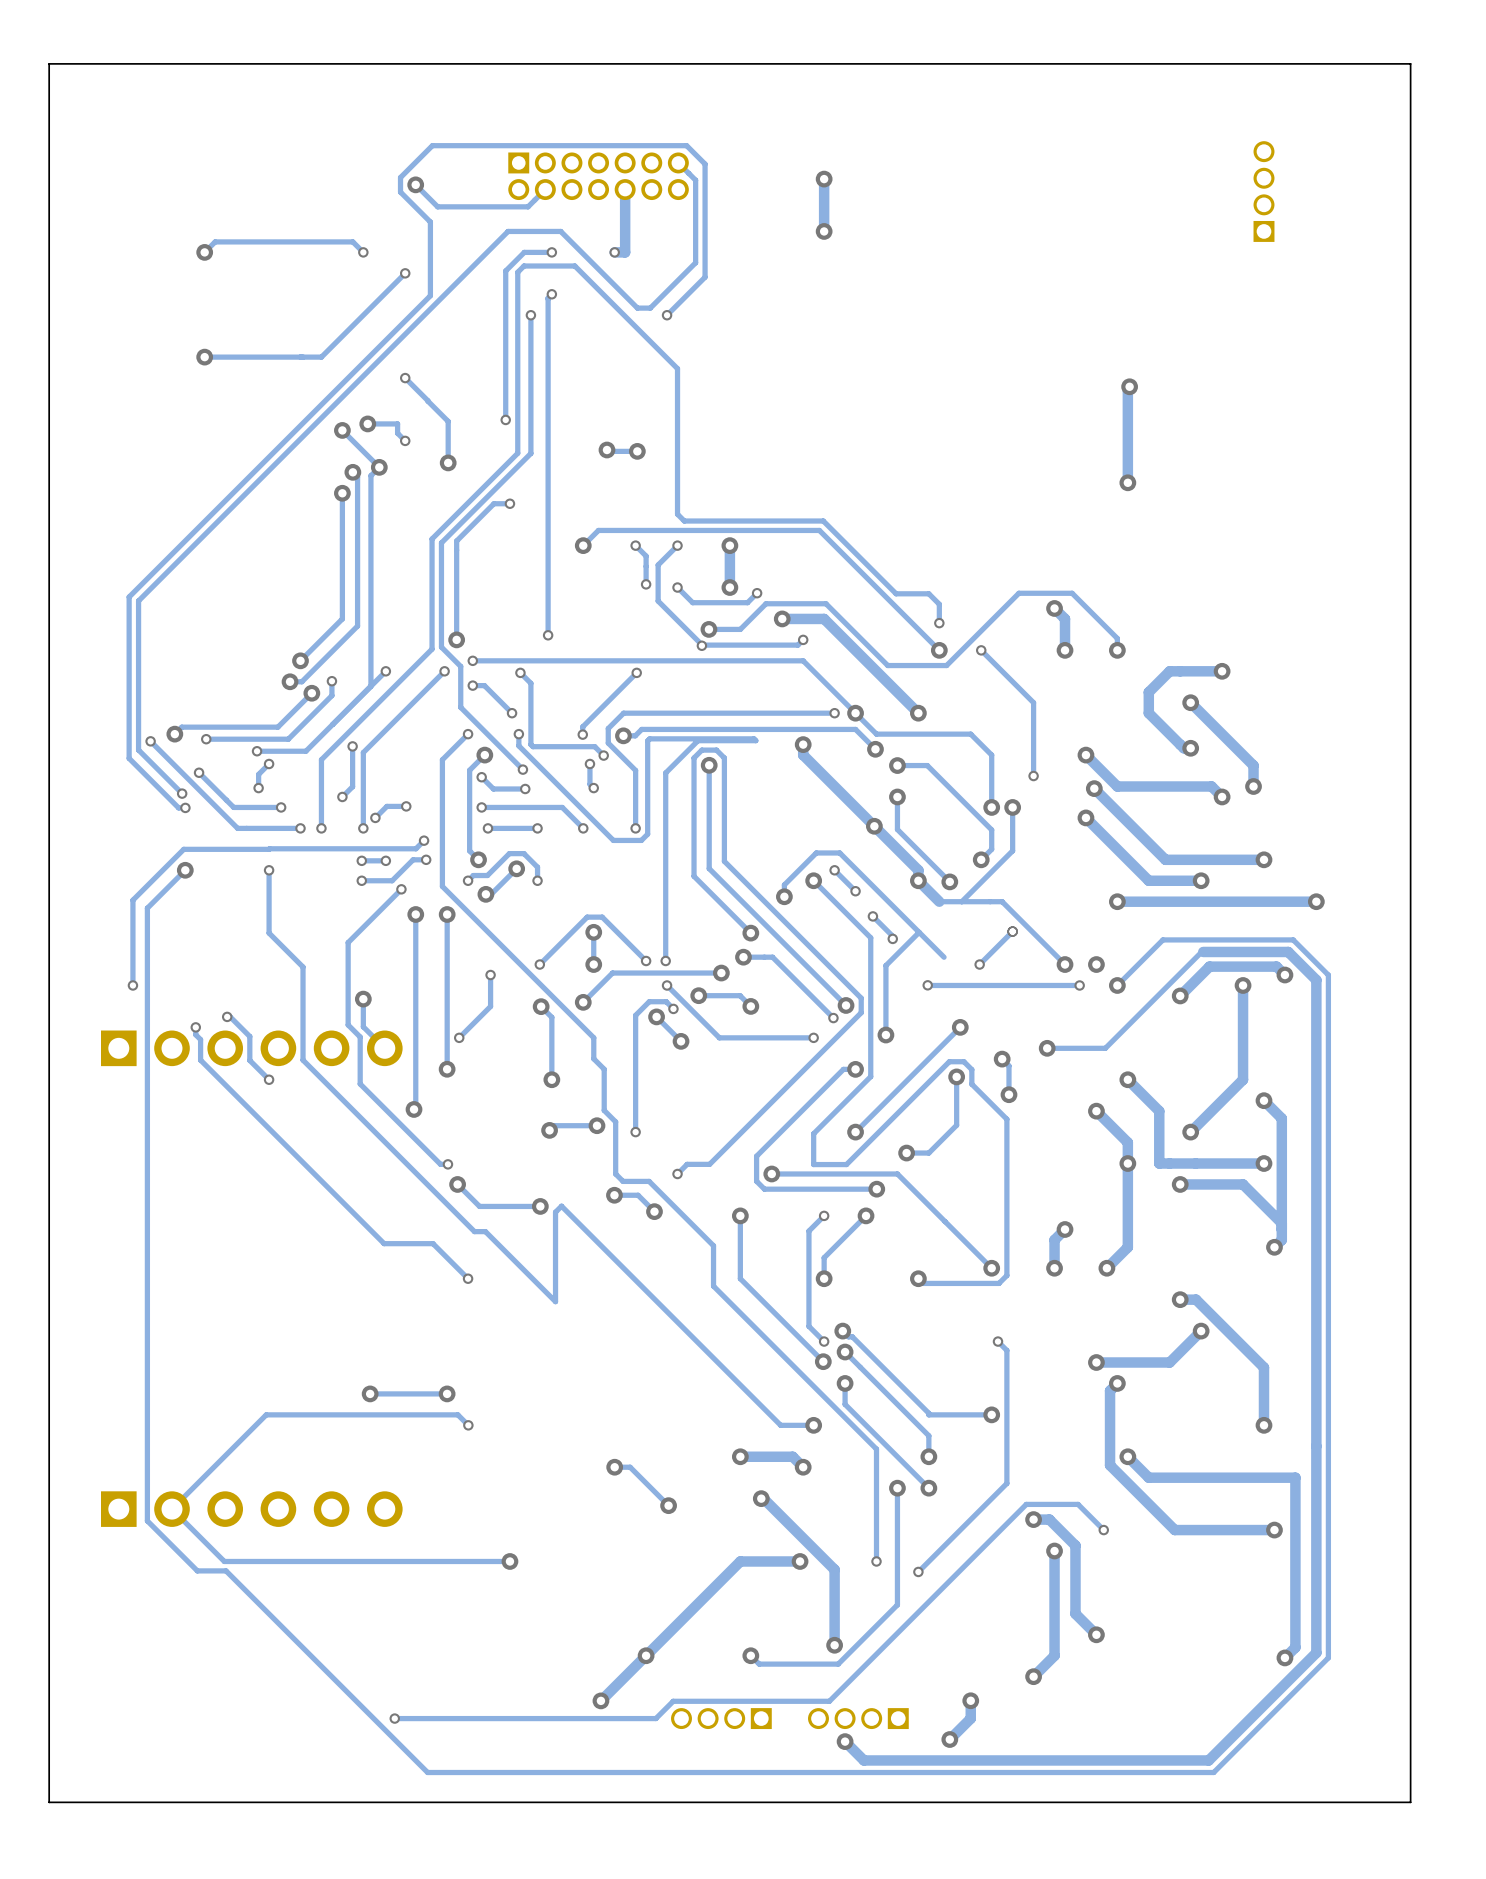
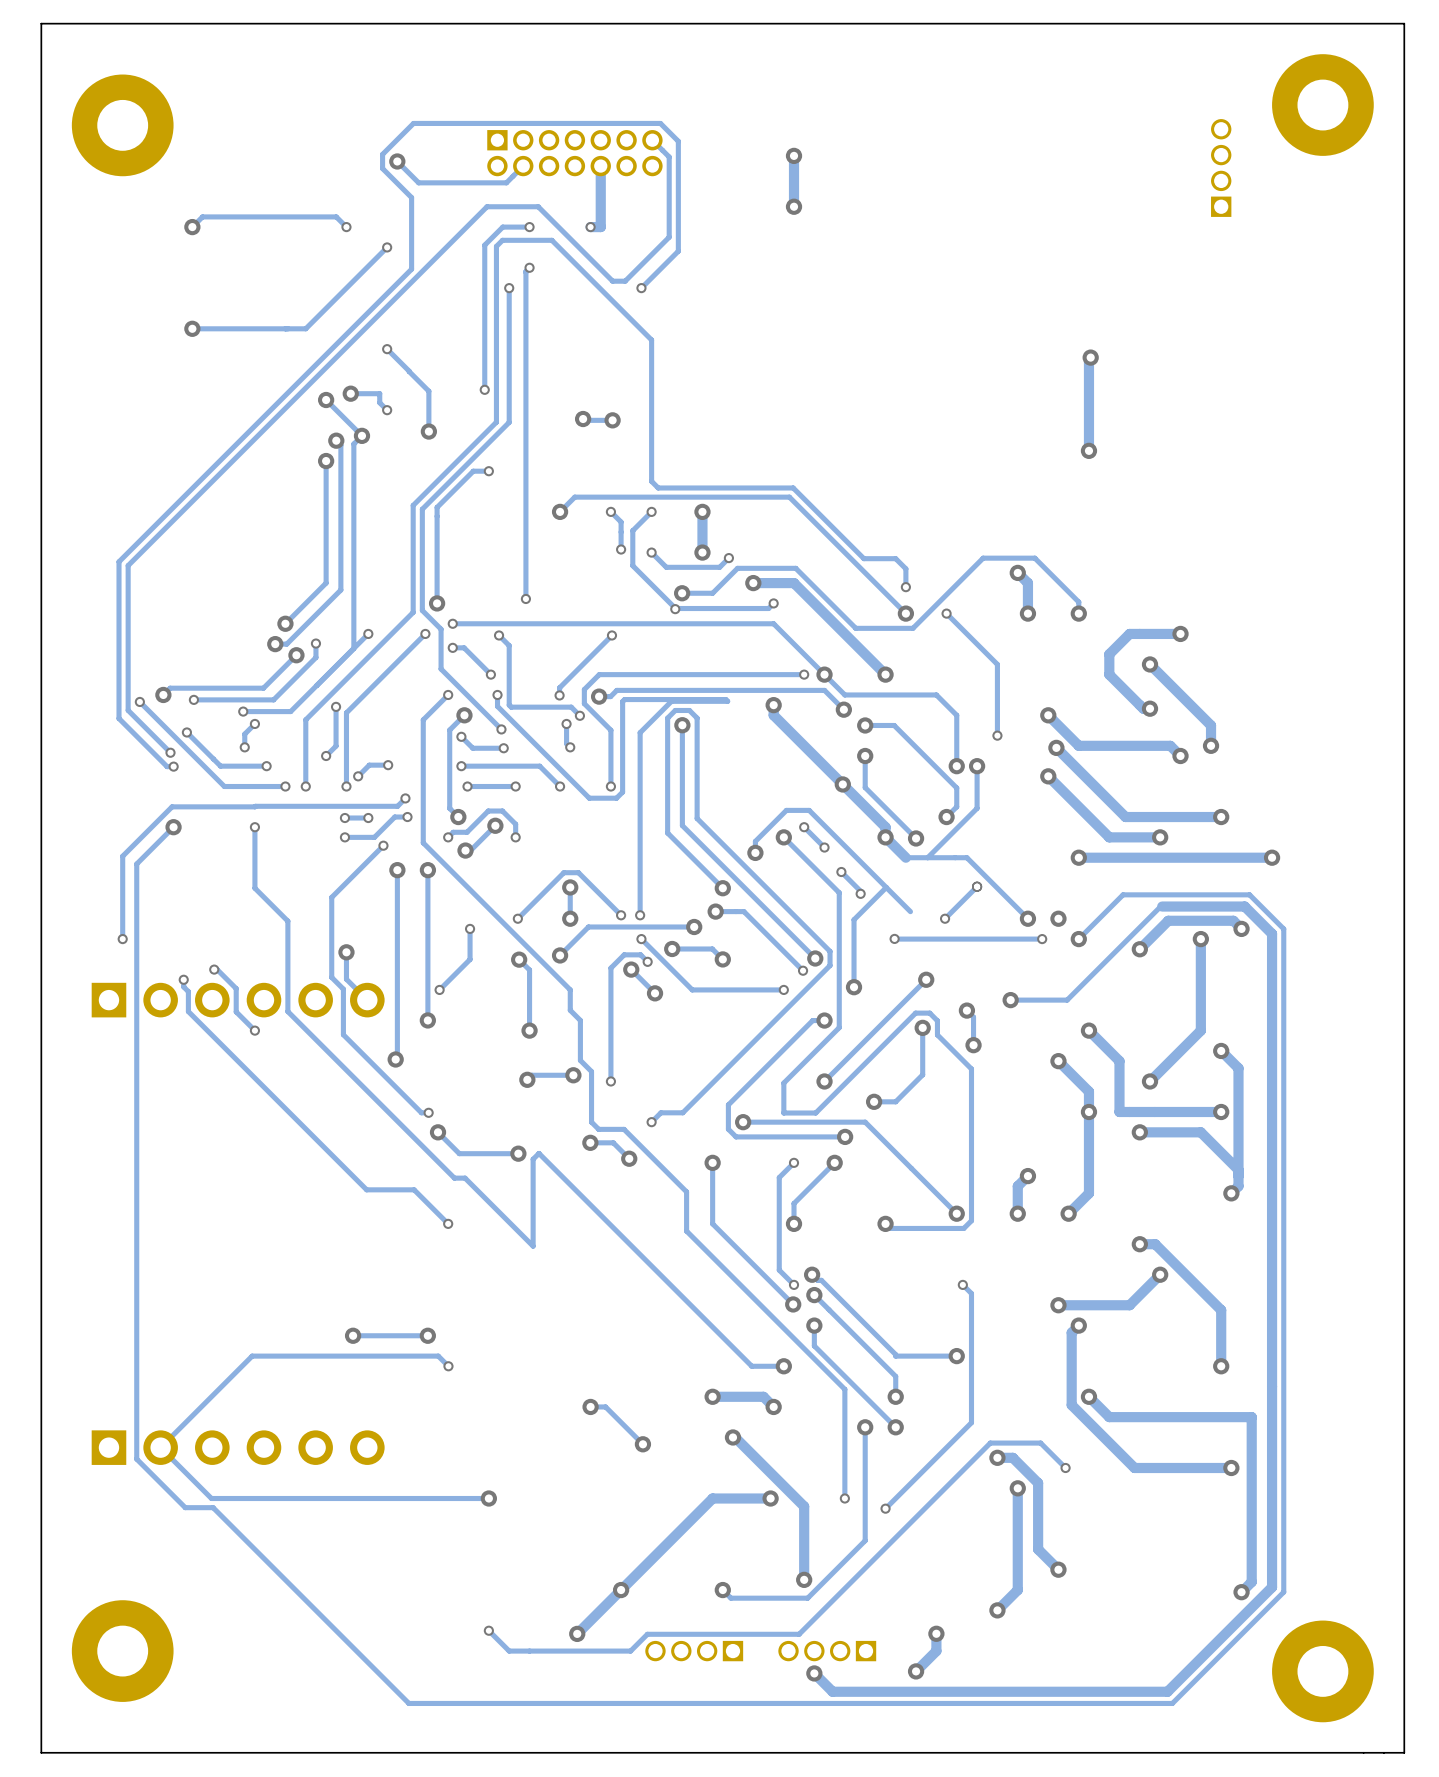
board edge: (49, 63) (1410, 63) (1410, 1802) (49, 1802) -> (41, 44) (41, 23) (1404, 23) (1404, 1752) (41, 1752) (41, 1732)
part: none -> (1322, 105)
part: none -> (122, 125)
part: none -> (122, 1651)
via position: (394, 1718) -> (488, 1630)
track: (530, 1718) (394, 1718) -> (509, 1651) (488, 1630)
part: none -> (1322, 1671)

